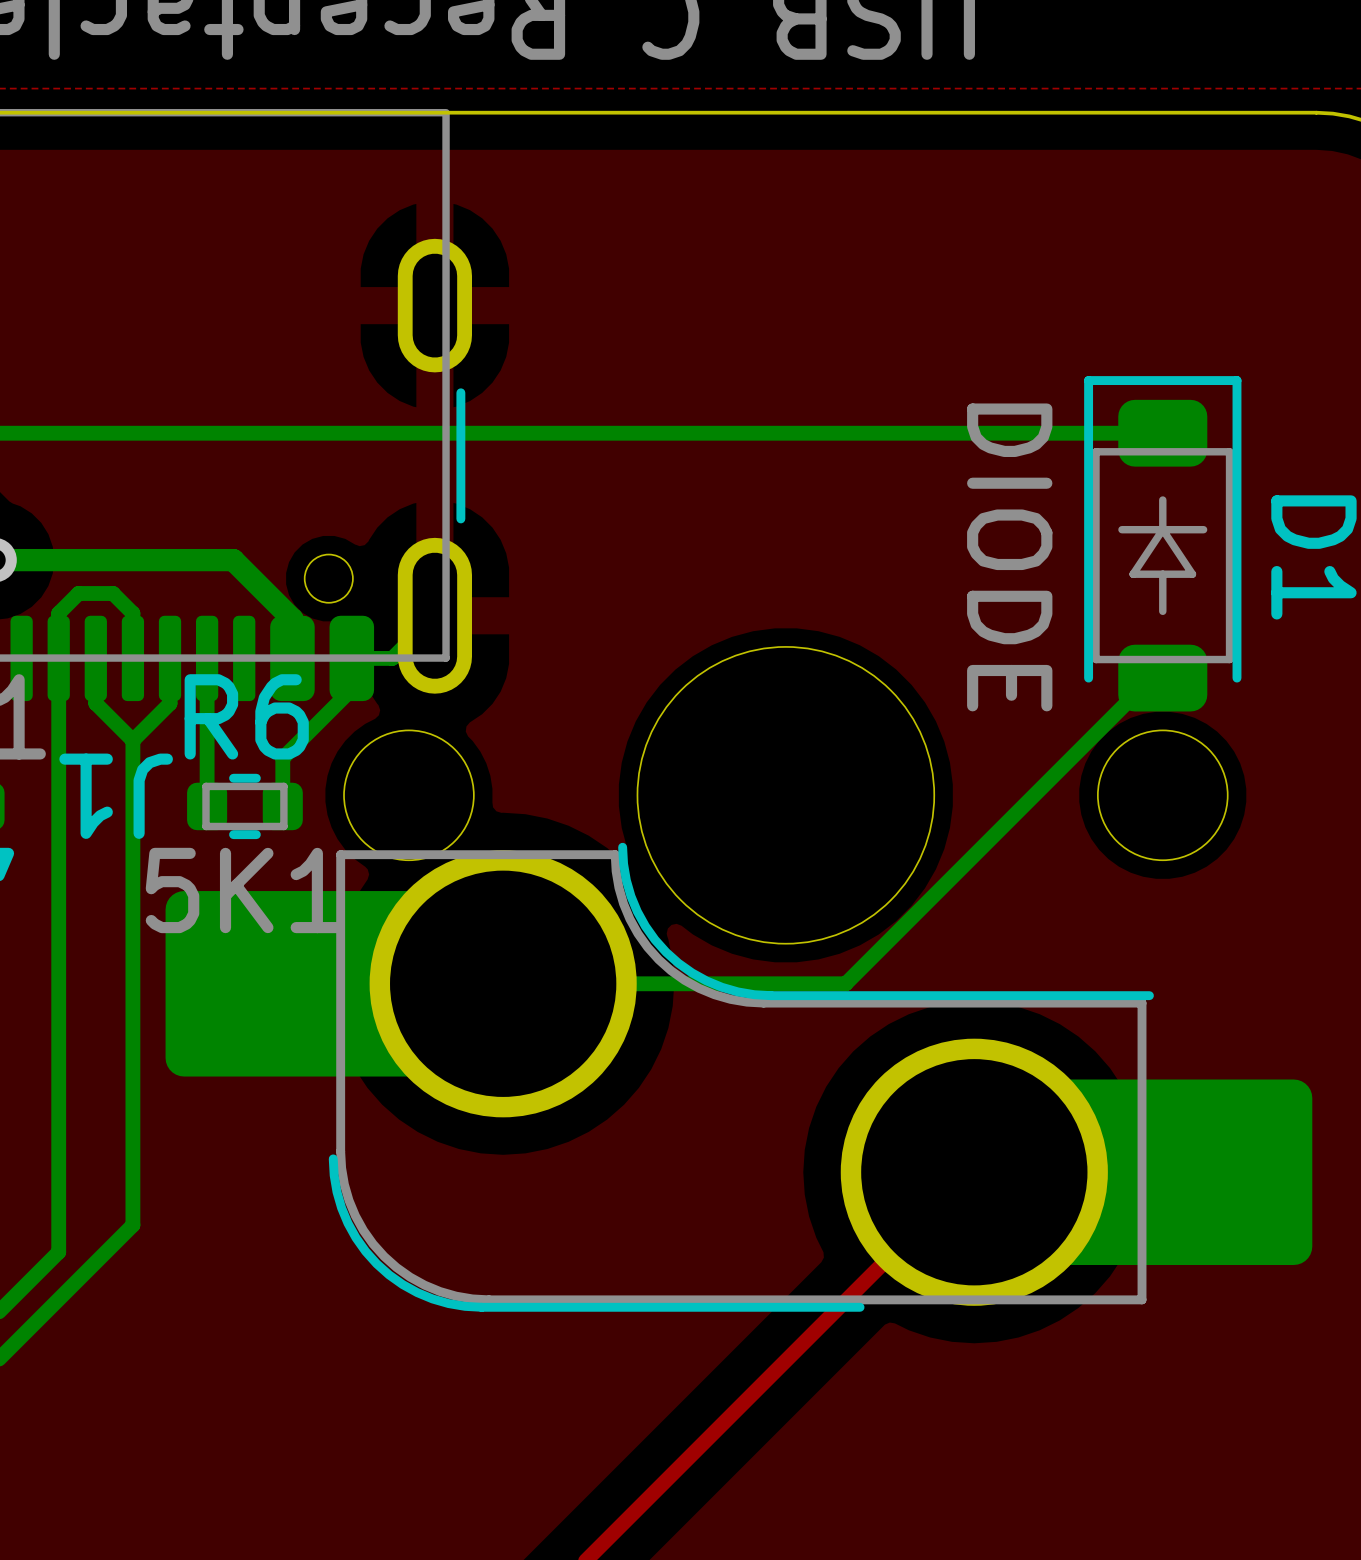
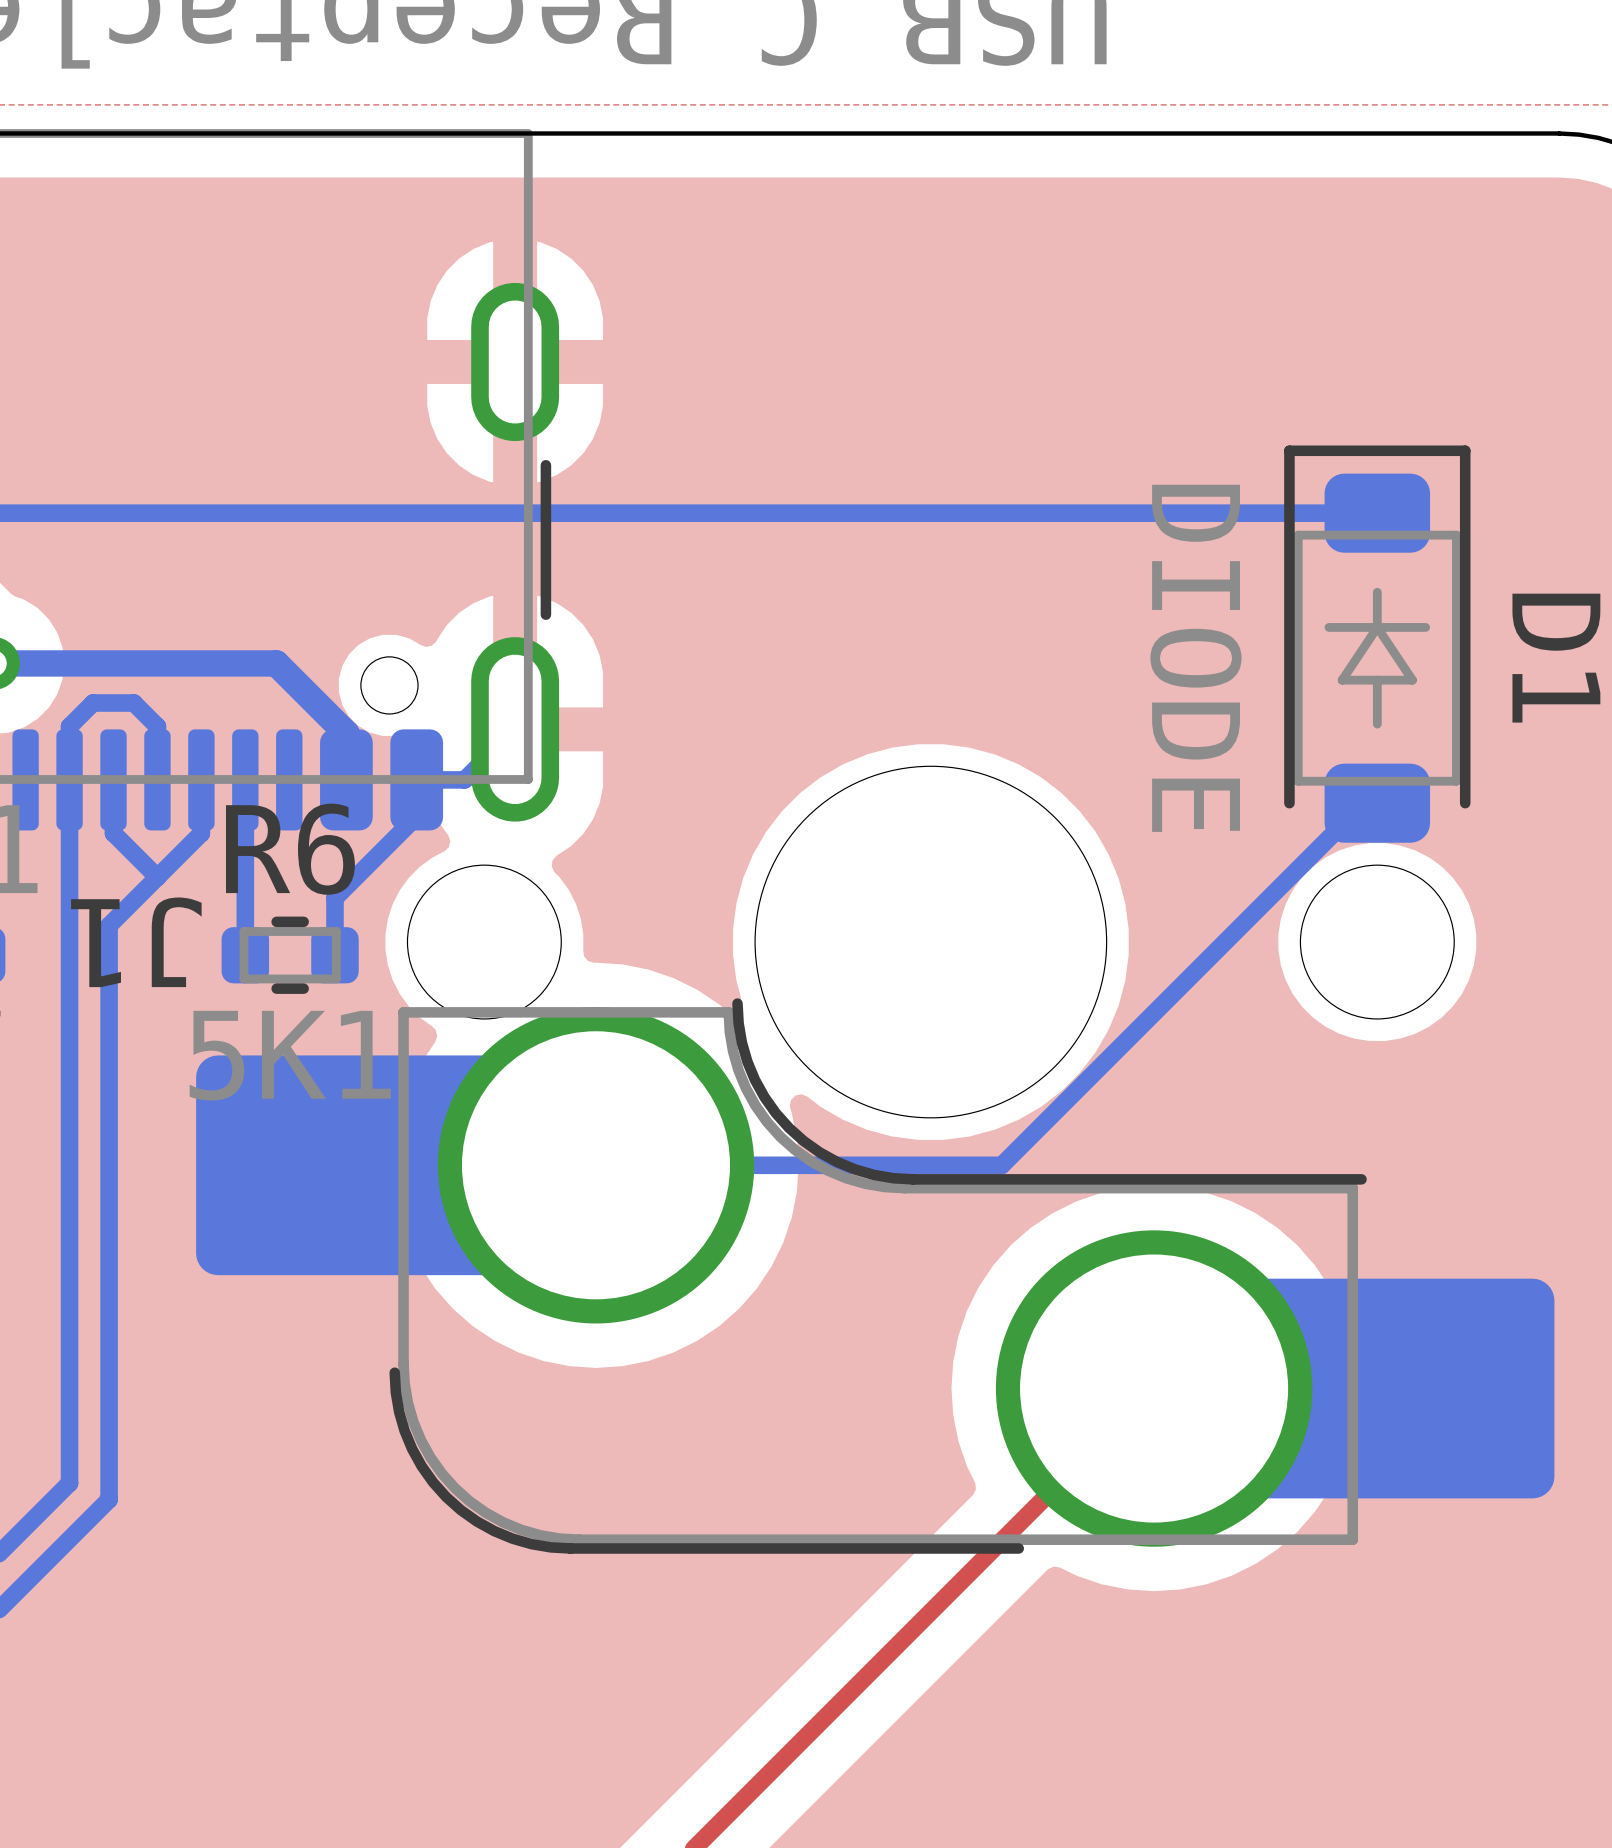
bottom track: (132, 740) (132, 1225) (92, 1265) -> (157, 877) (109, 925) (109, 1499)

